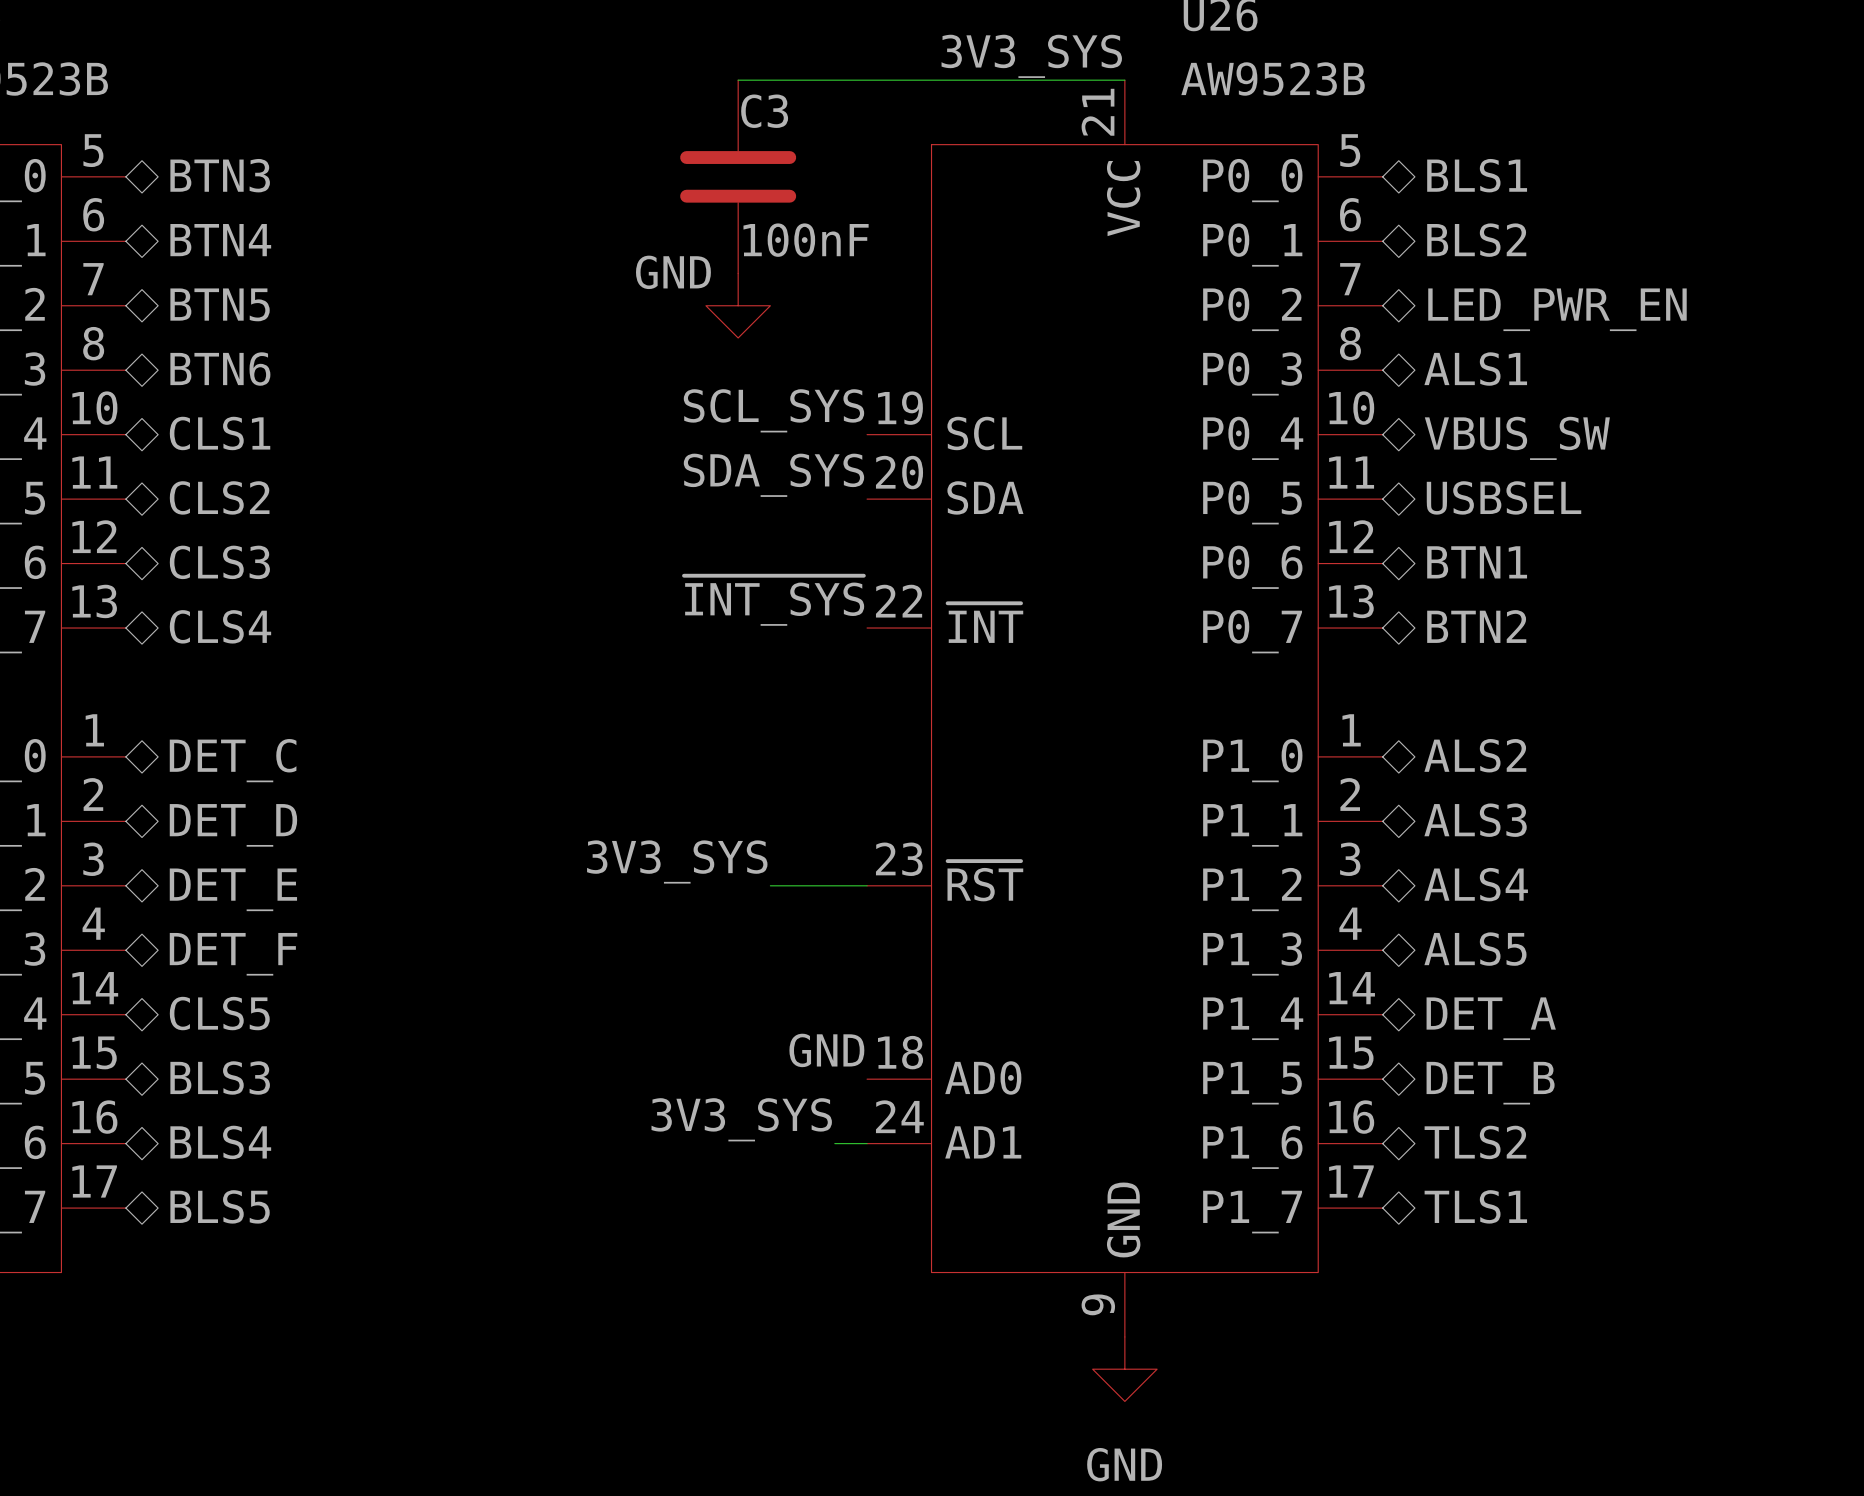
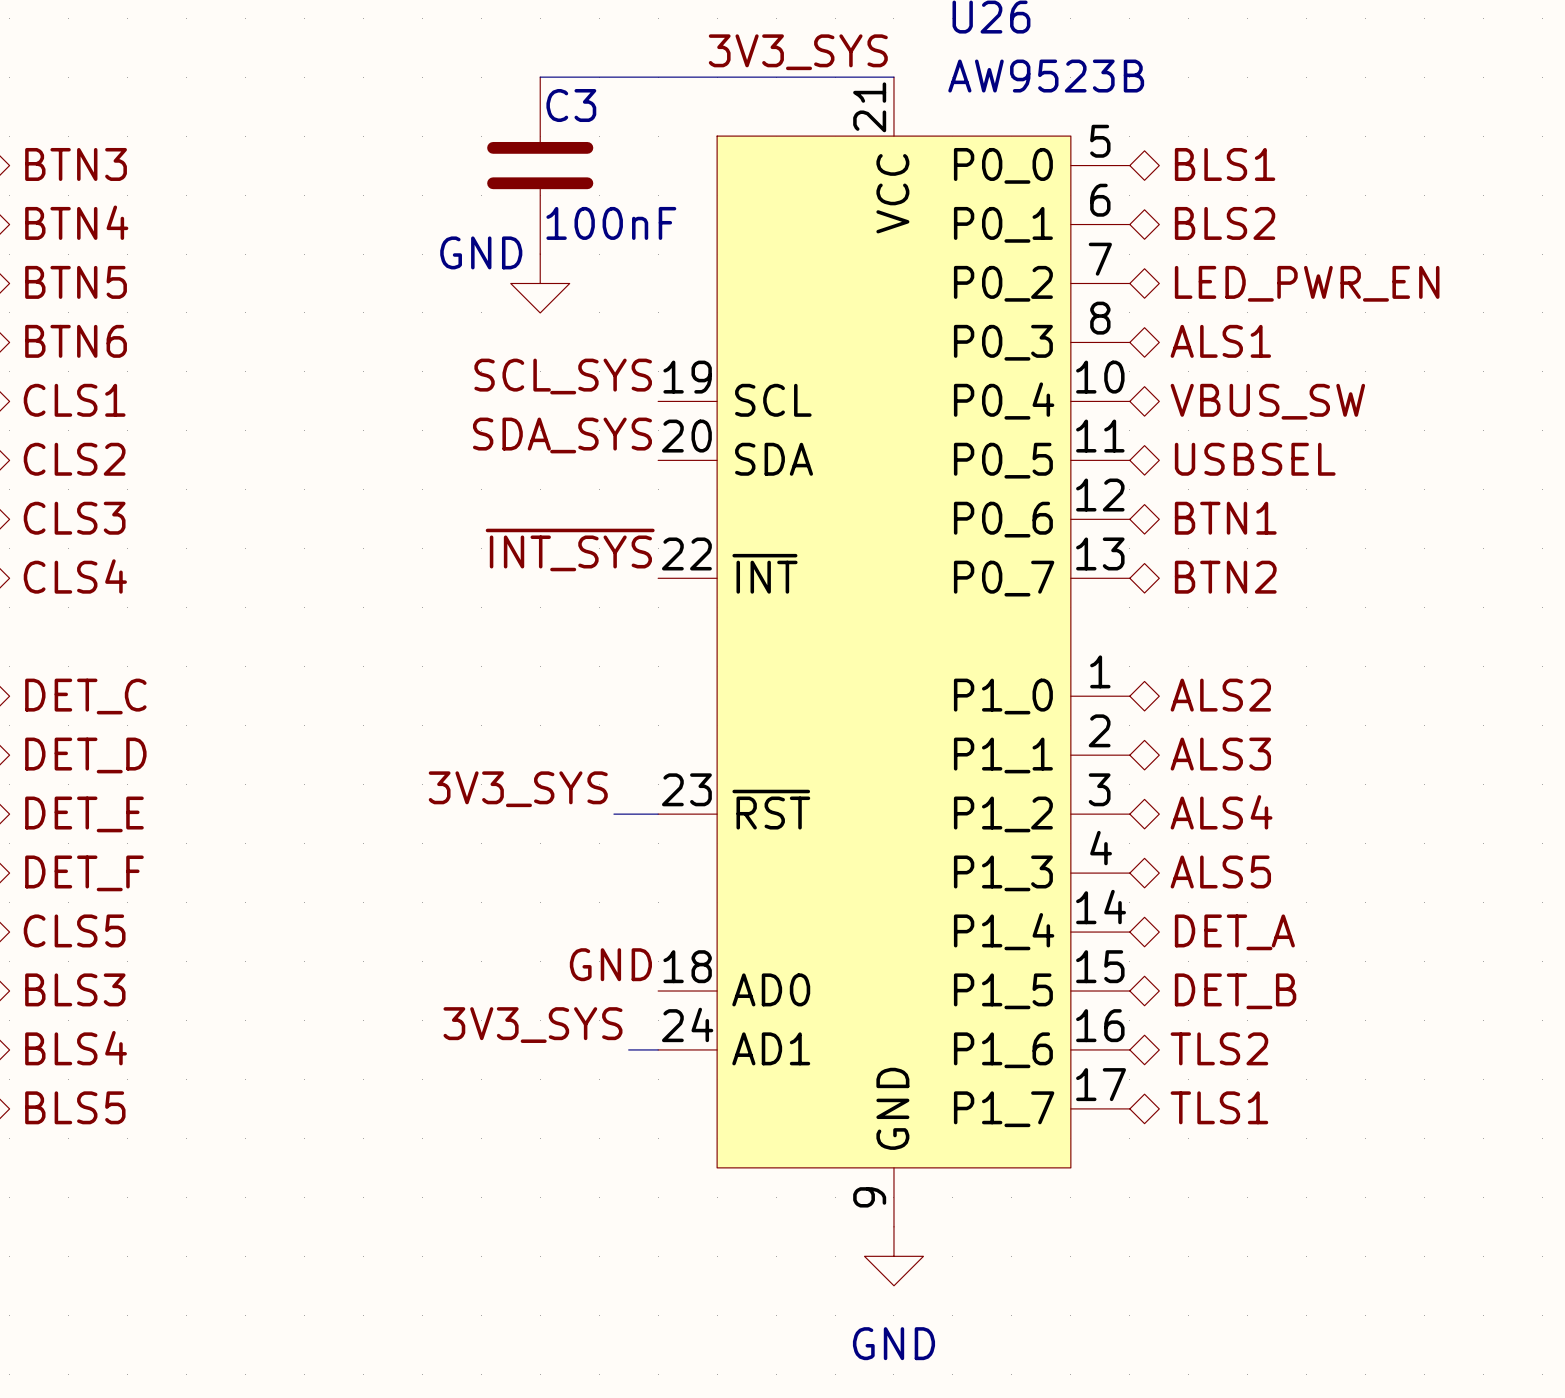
label position: 3V3_SYS (677, 861) -> 3V3_SYS (518, 789)
wire: (770, 885) (818, 885) -> none

